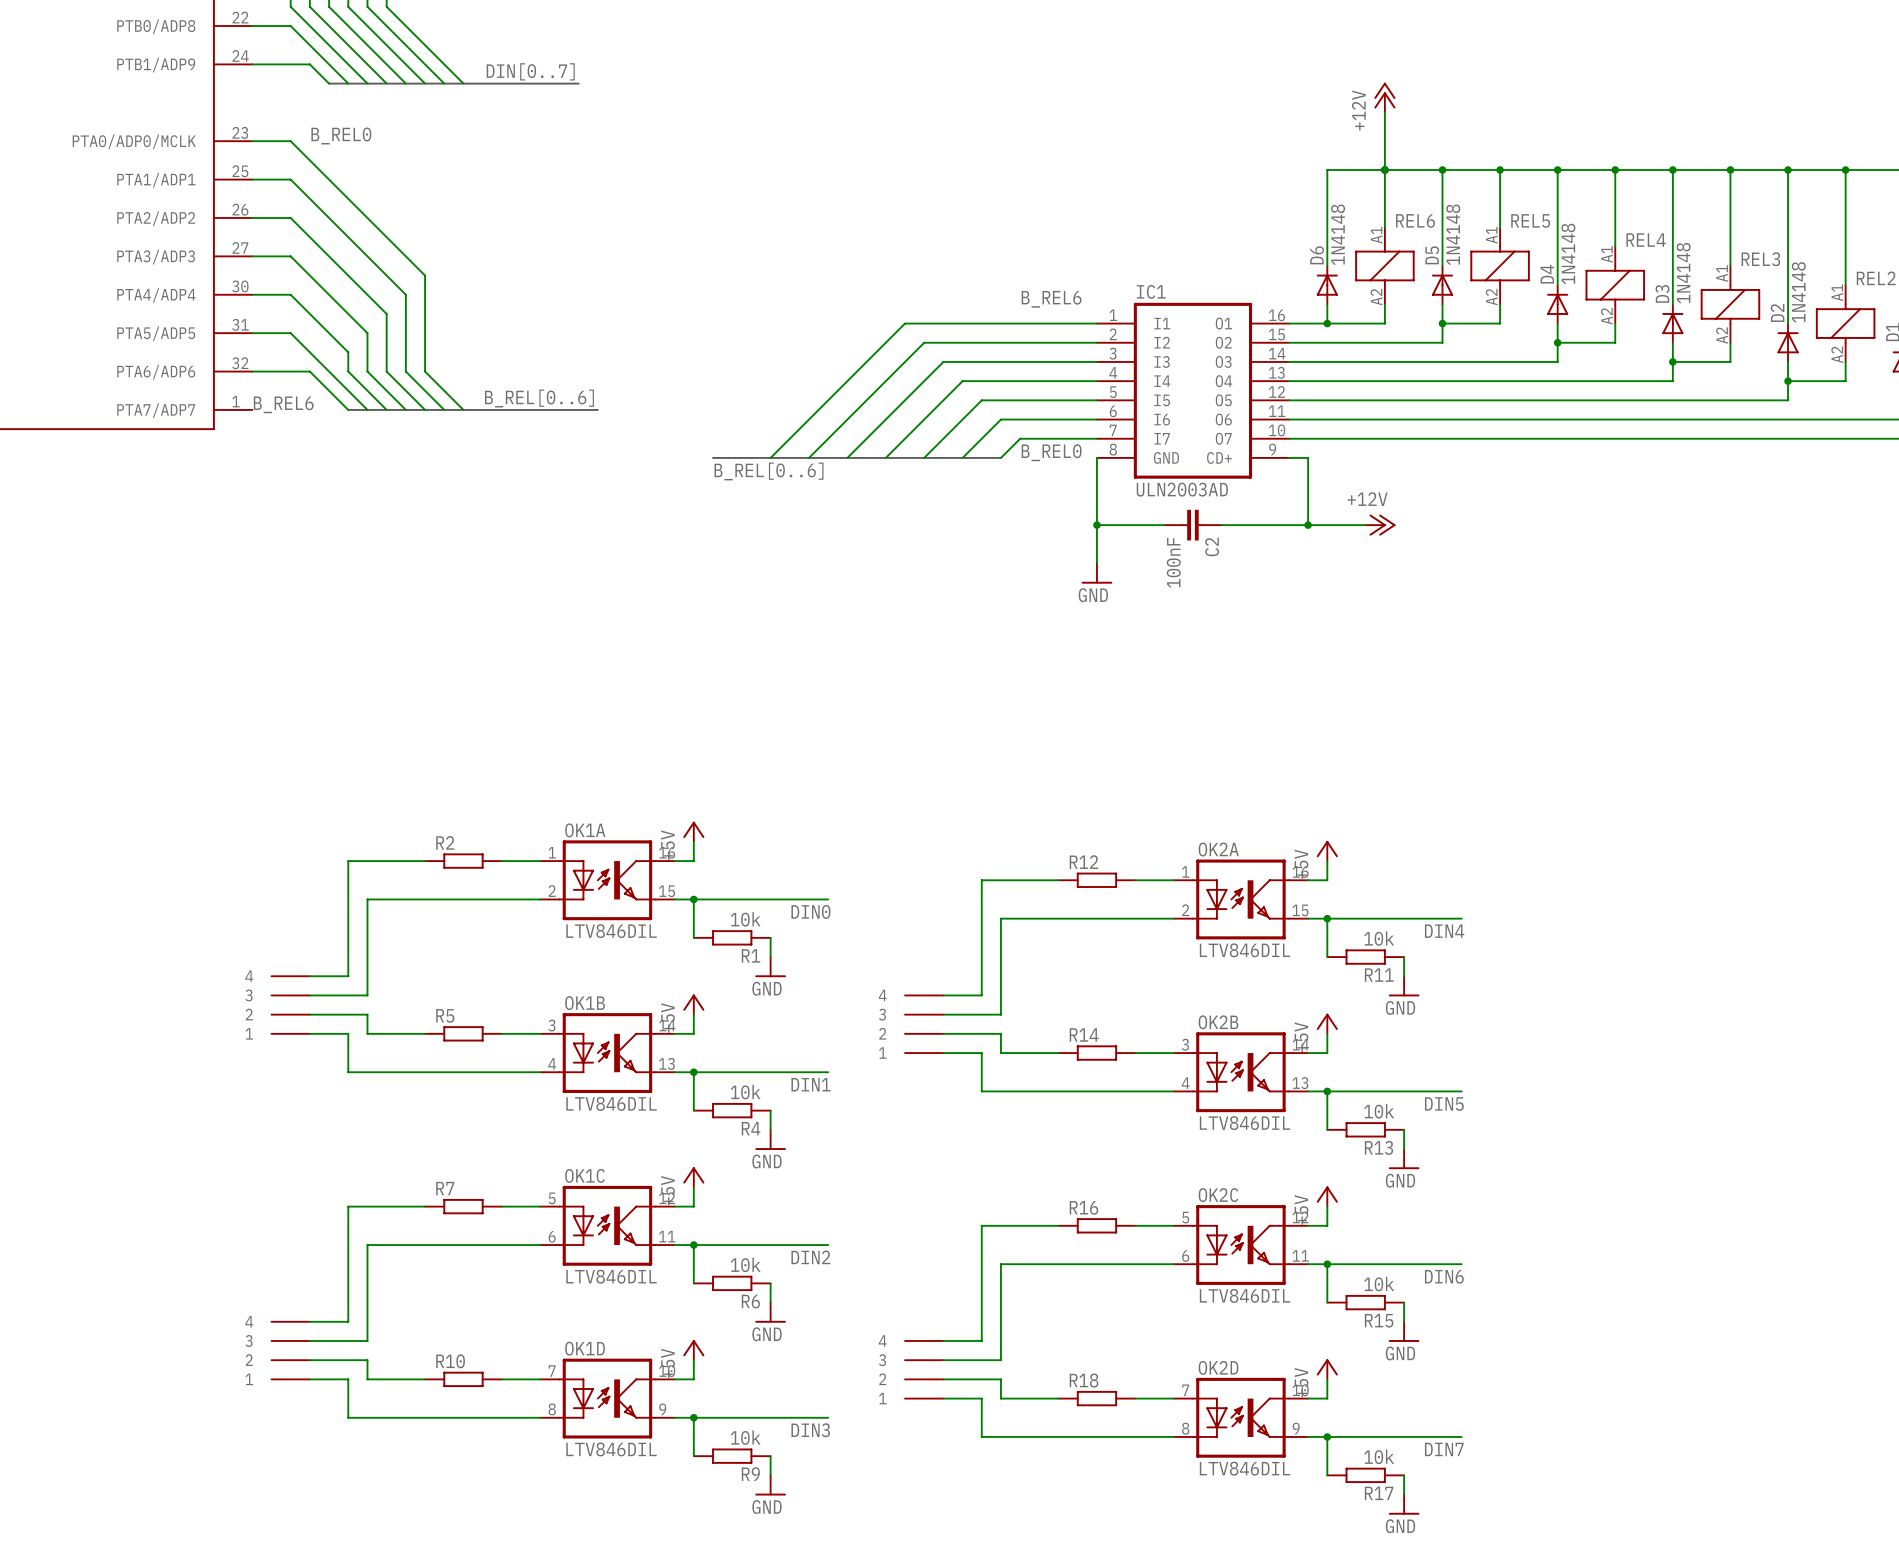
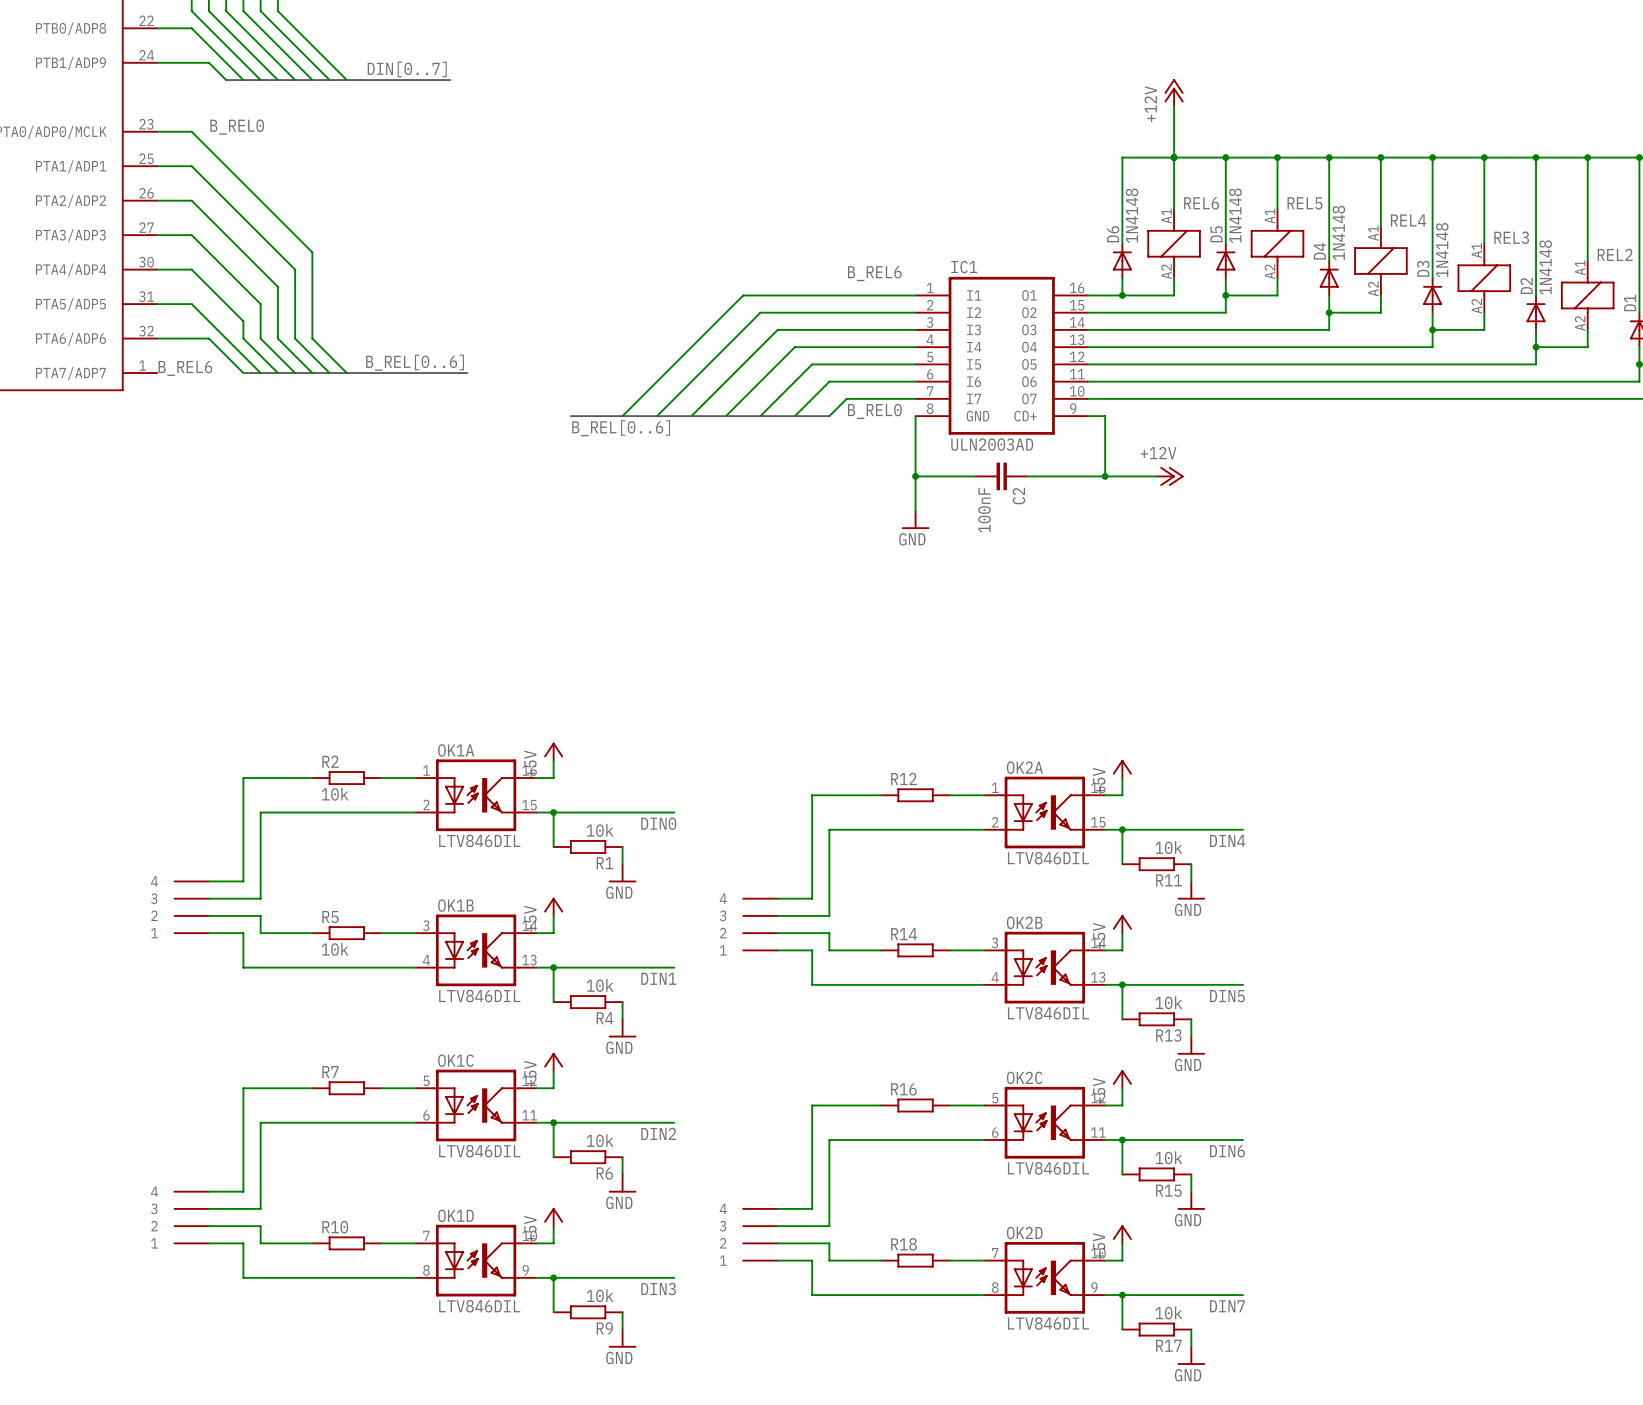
R2 value: none -> 10k (335, 794)
R5 value: none -> 10k (335, 949)

